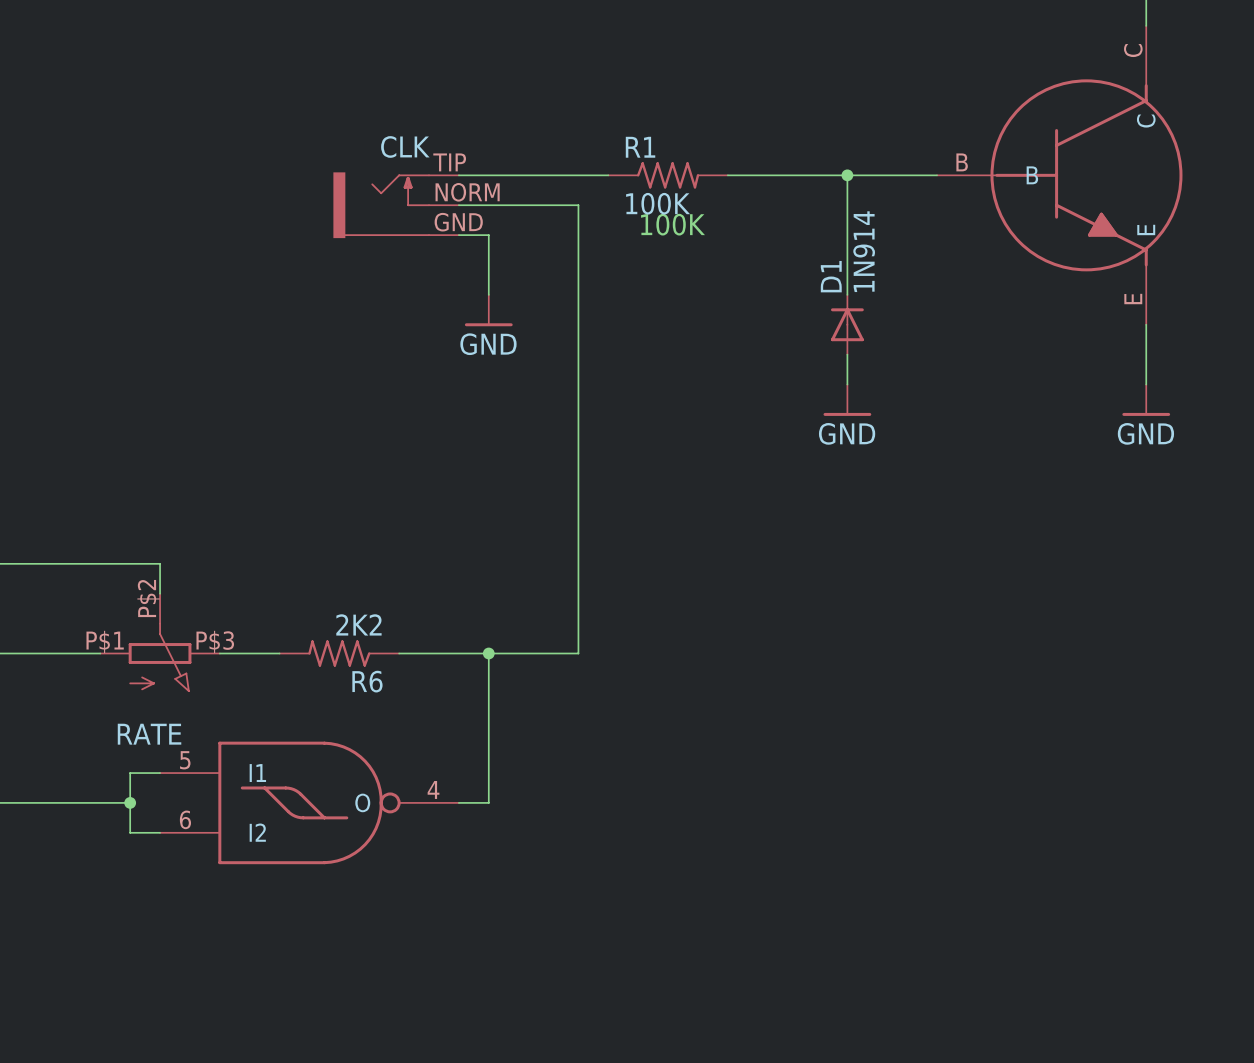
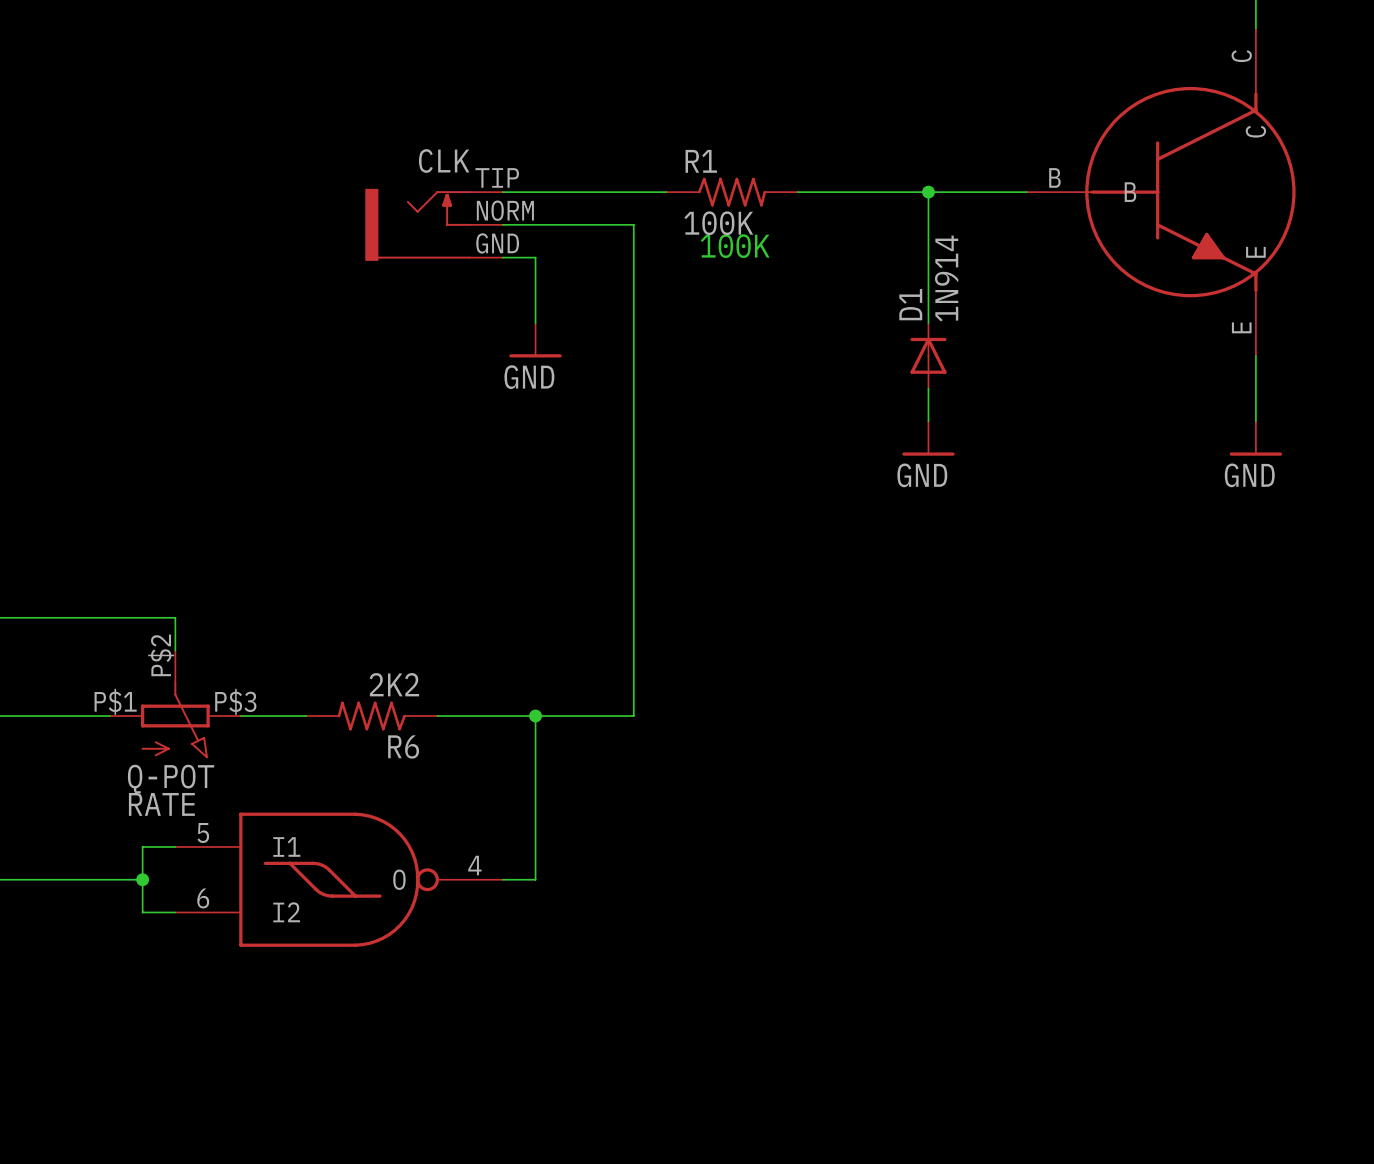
RATE value: none -> Q-POT (171, 779)

